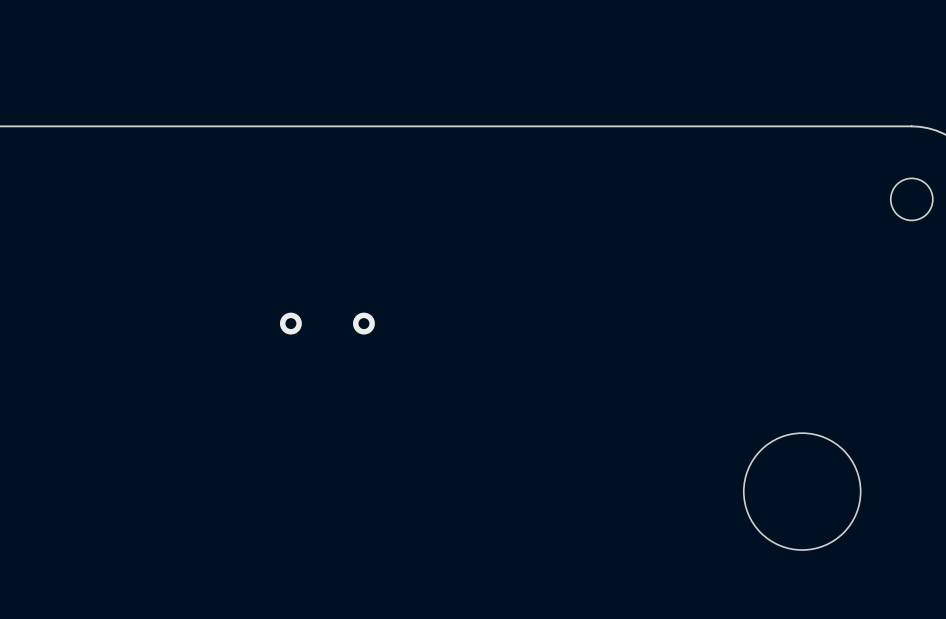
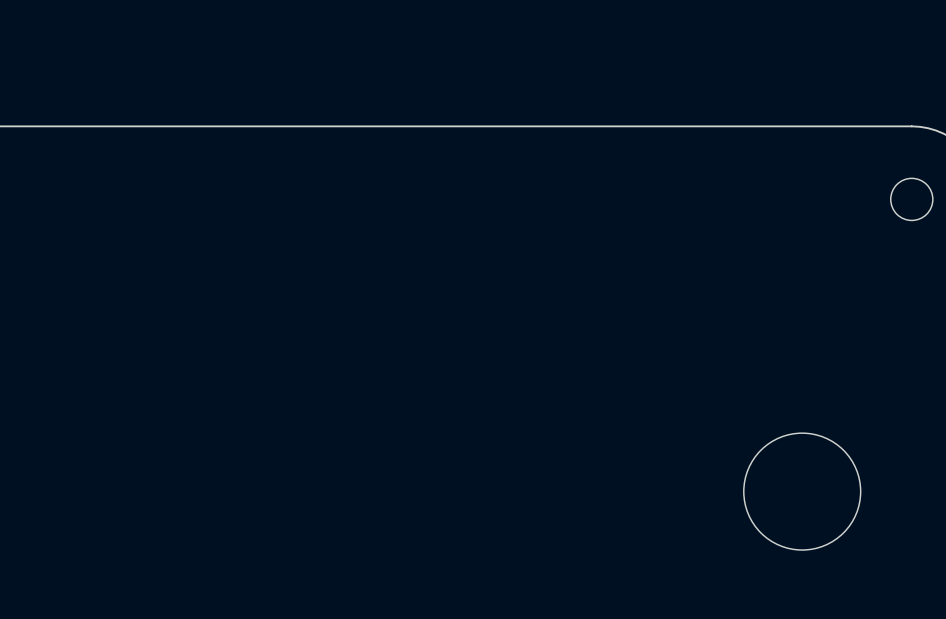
via: (290, 323) -> none
via: (363, 323) -> none

